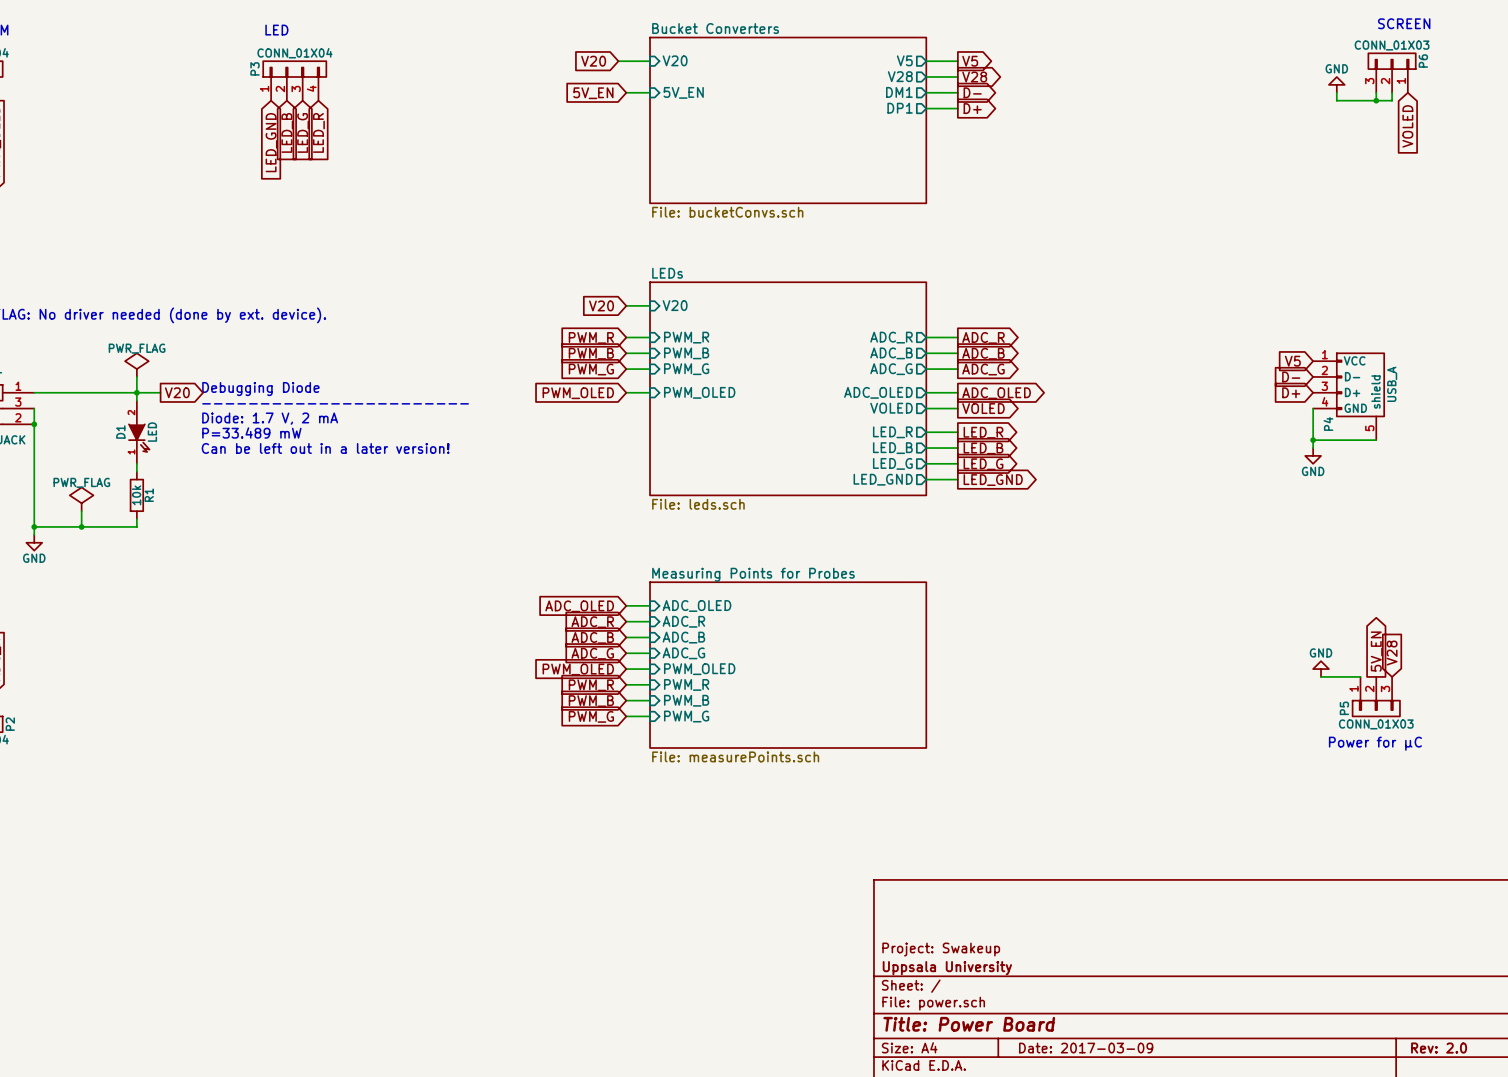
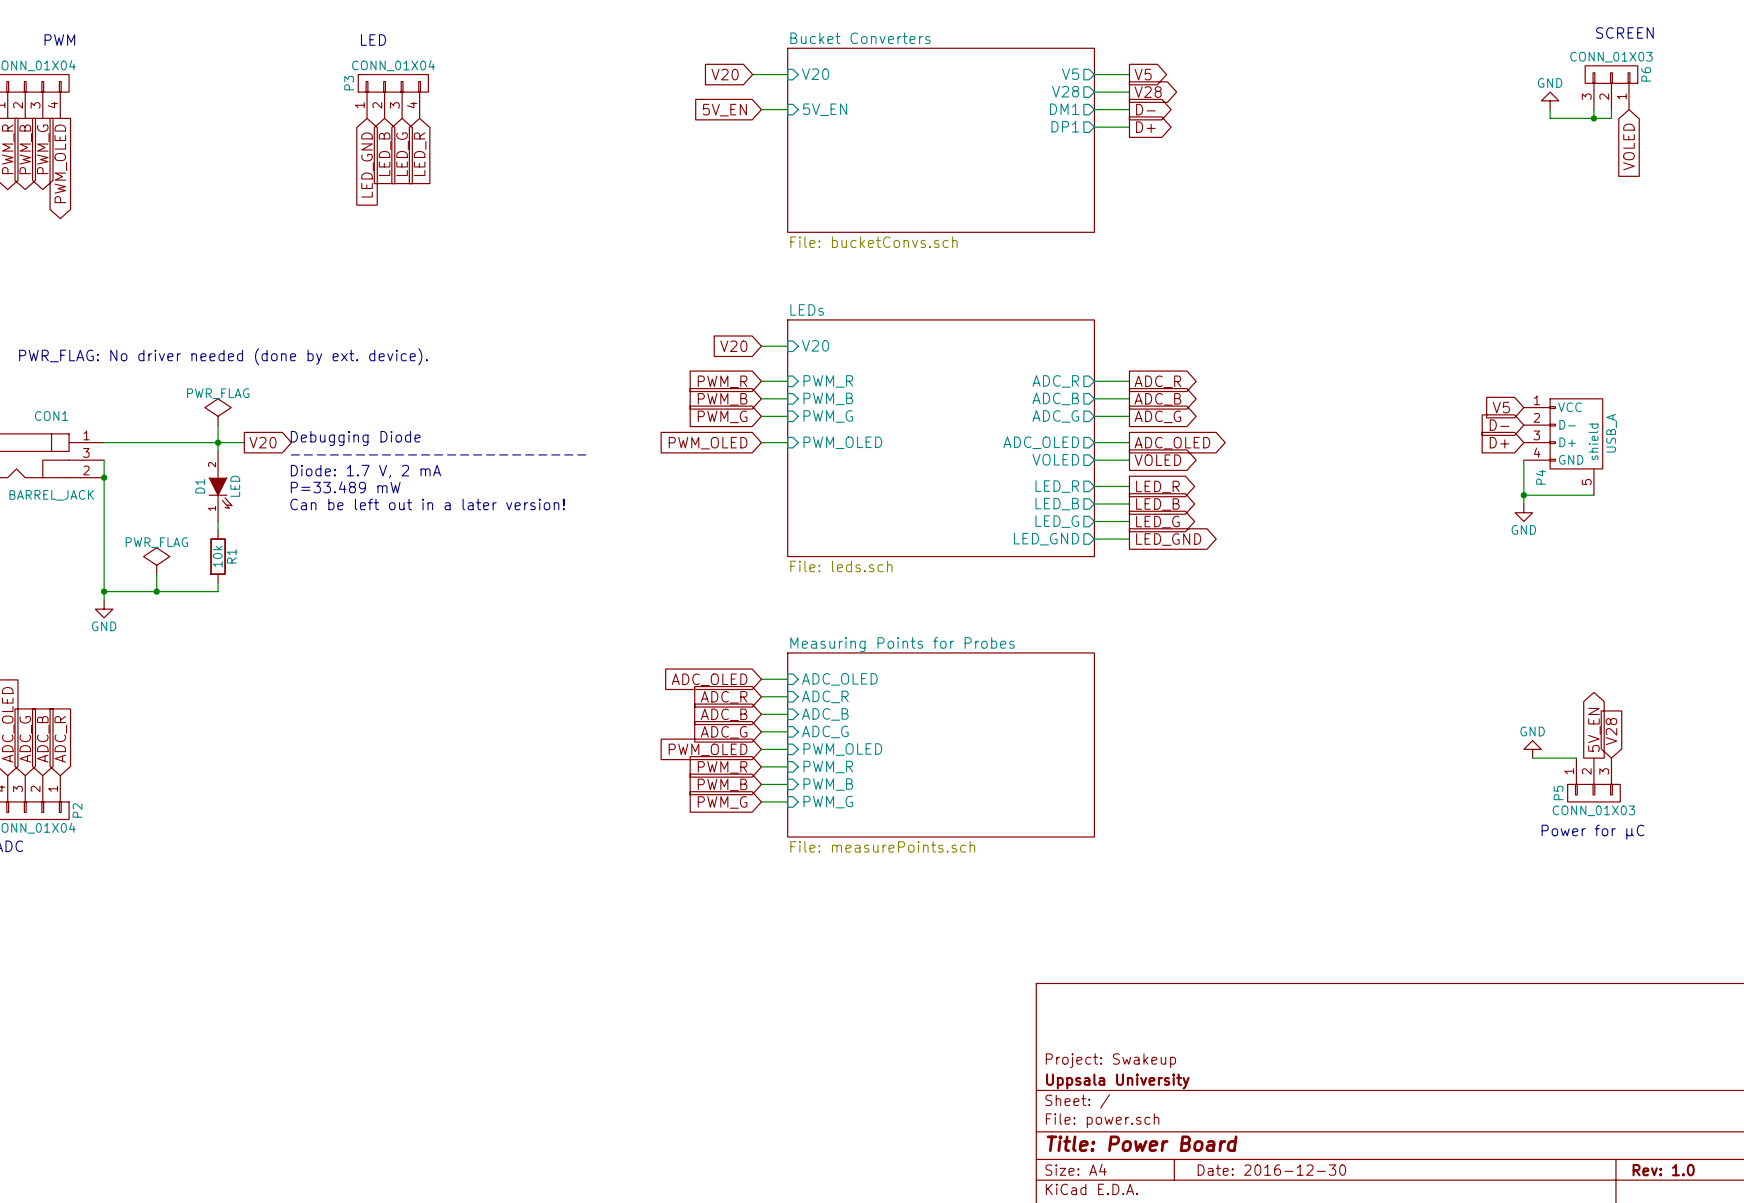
title block: Date: 2017-03-09 (1086, 1048) -> Date: 2016-12-30 (1271, 1170)
title block: Rev: 2.0 (1439, 1048) -> Rev: 1.0 (1663, 1170)

